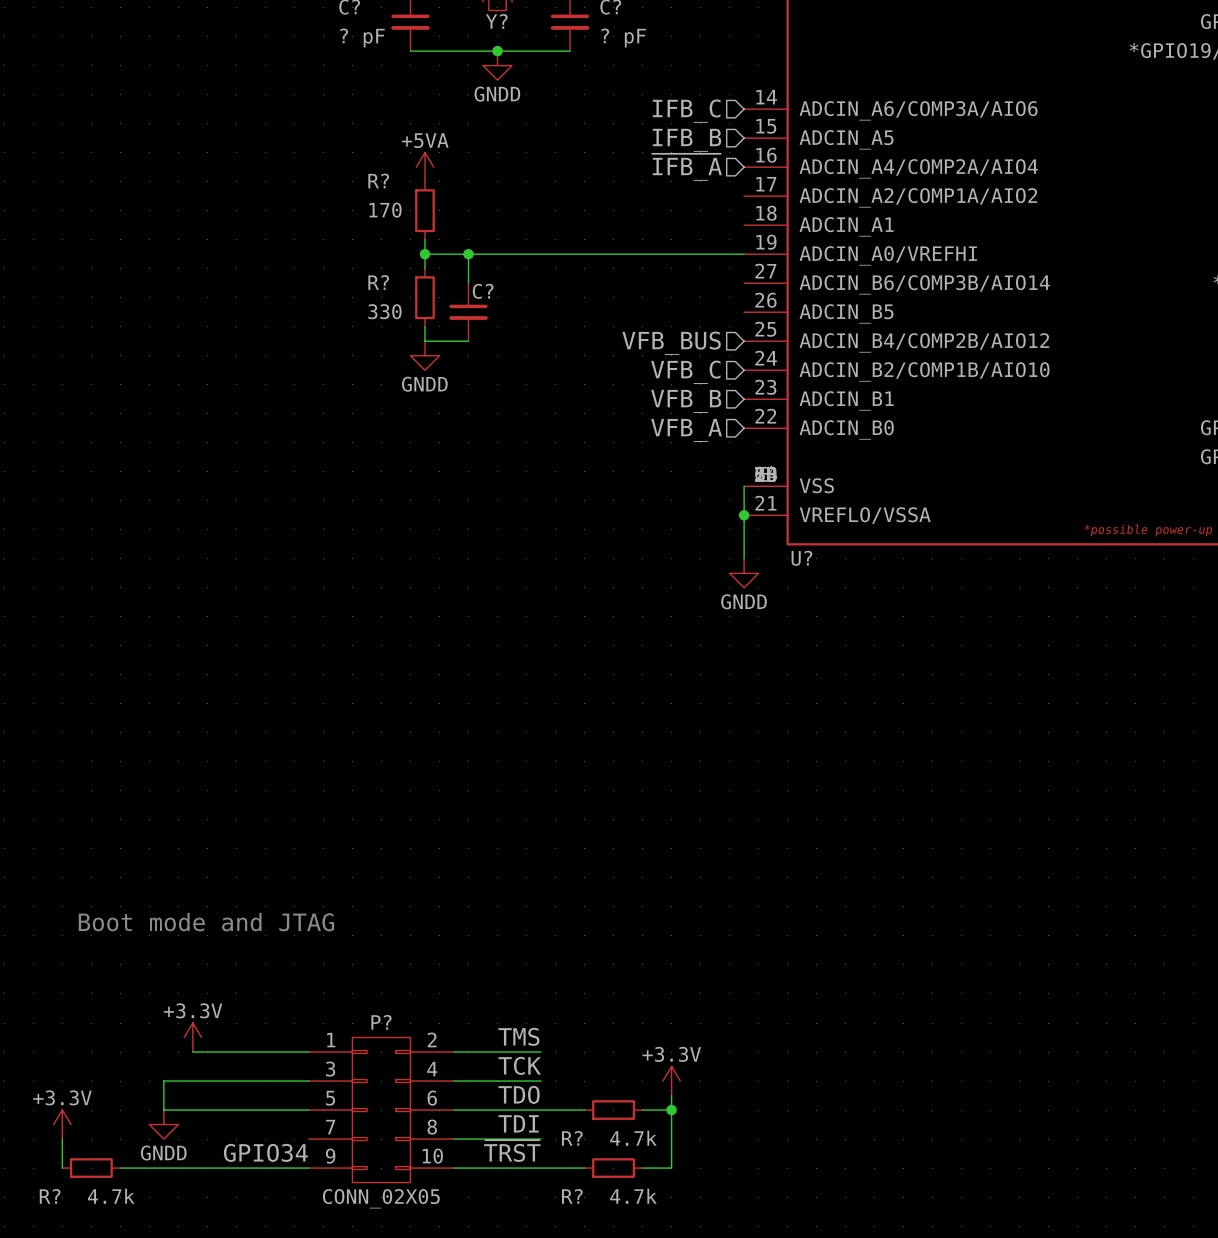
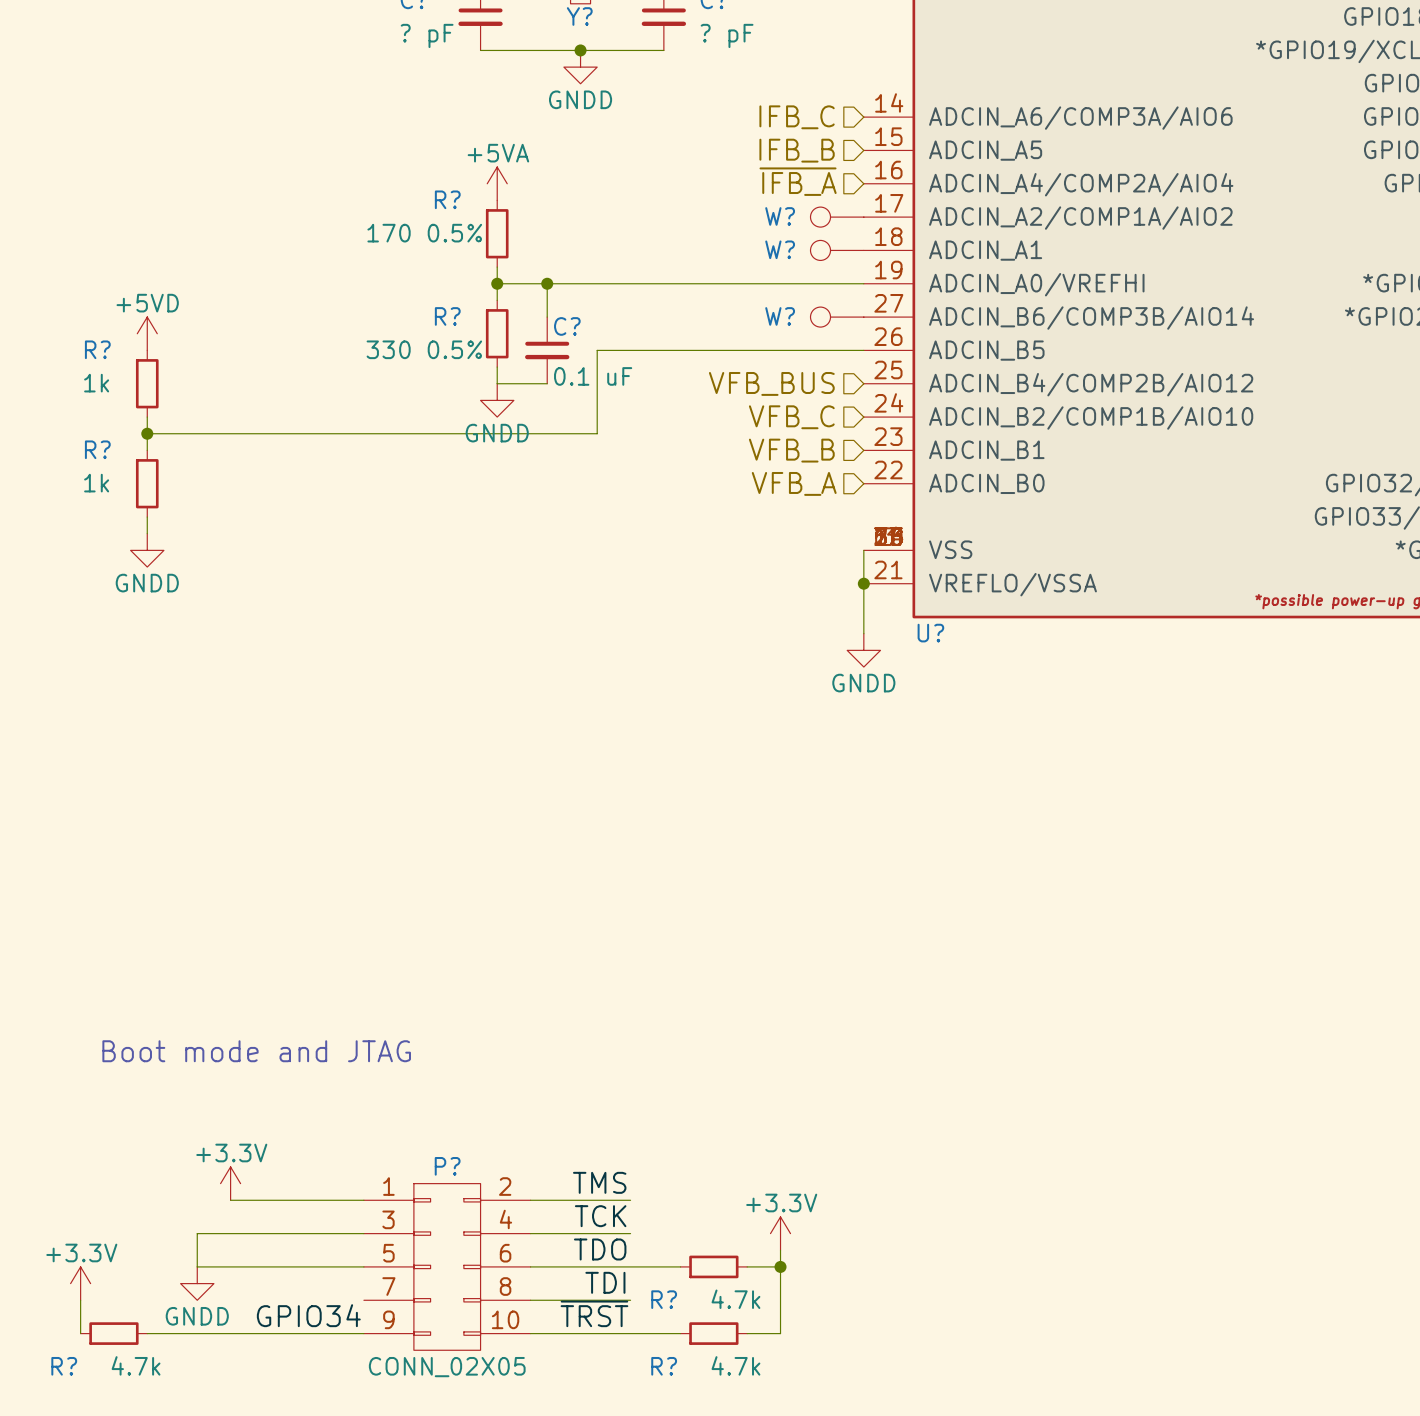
W?: none -> (837, 217)
R? value: 170 (385, 210) -> 170 0.5% (424, 233)
W?: none -> (837, 250)
W?: none -> (837, 317)
power symbol: none -> +5VD (147, 333)
R? value: 330 (384, 311) -> 330 0.5% (424, 349)
wire: none -> (863, 350) (597, 350) (597, 433) (147, 433)
C? value: none -> 0.1 uF (593, 376)
R?: none -> 1k (147, 383)
wire: none -> (147, 417) (147, 450)
junction: none -> (147, 433)
R?: none -> 1k (147, 483)
wire: none -> (147, 517) (147, 533)
power symbol: none -> GNDD (147, 550)

